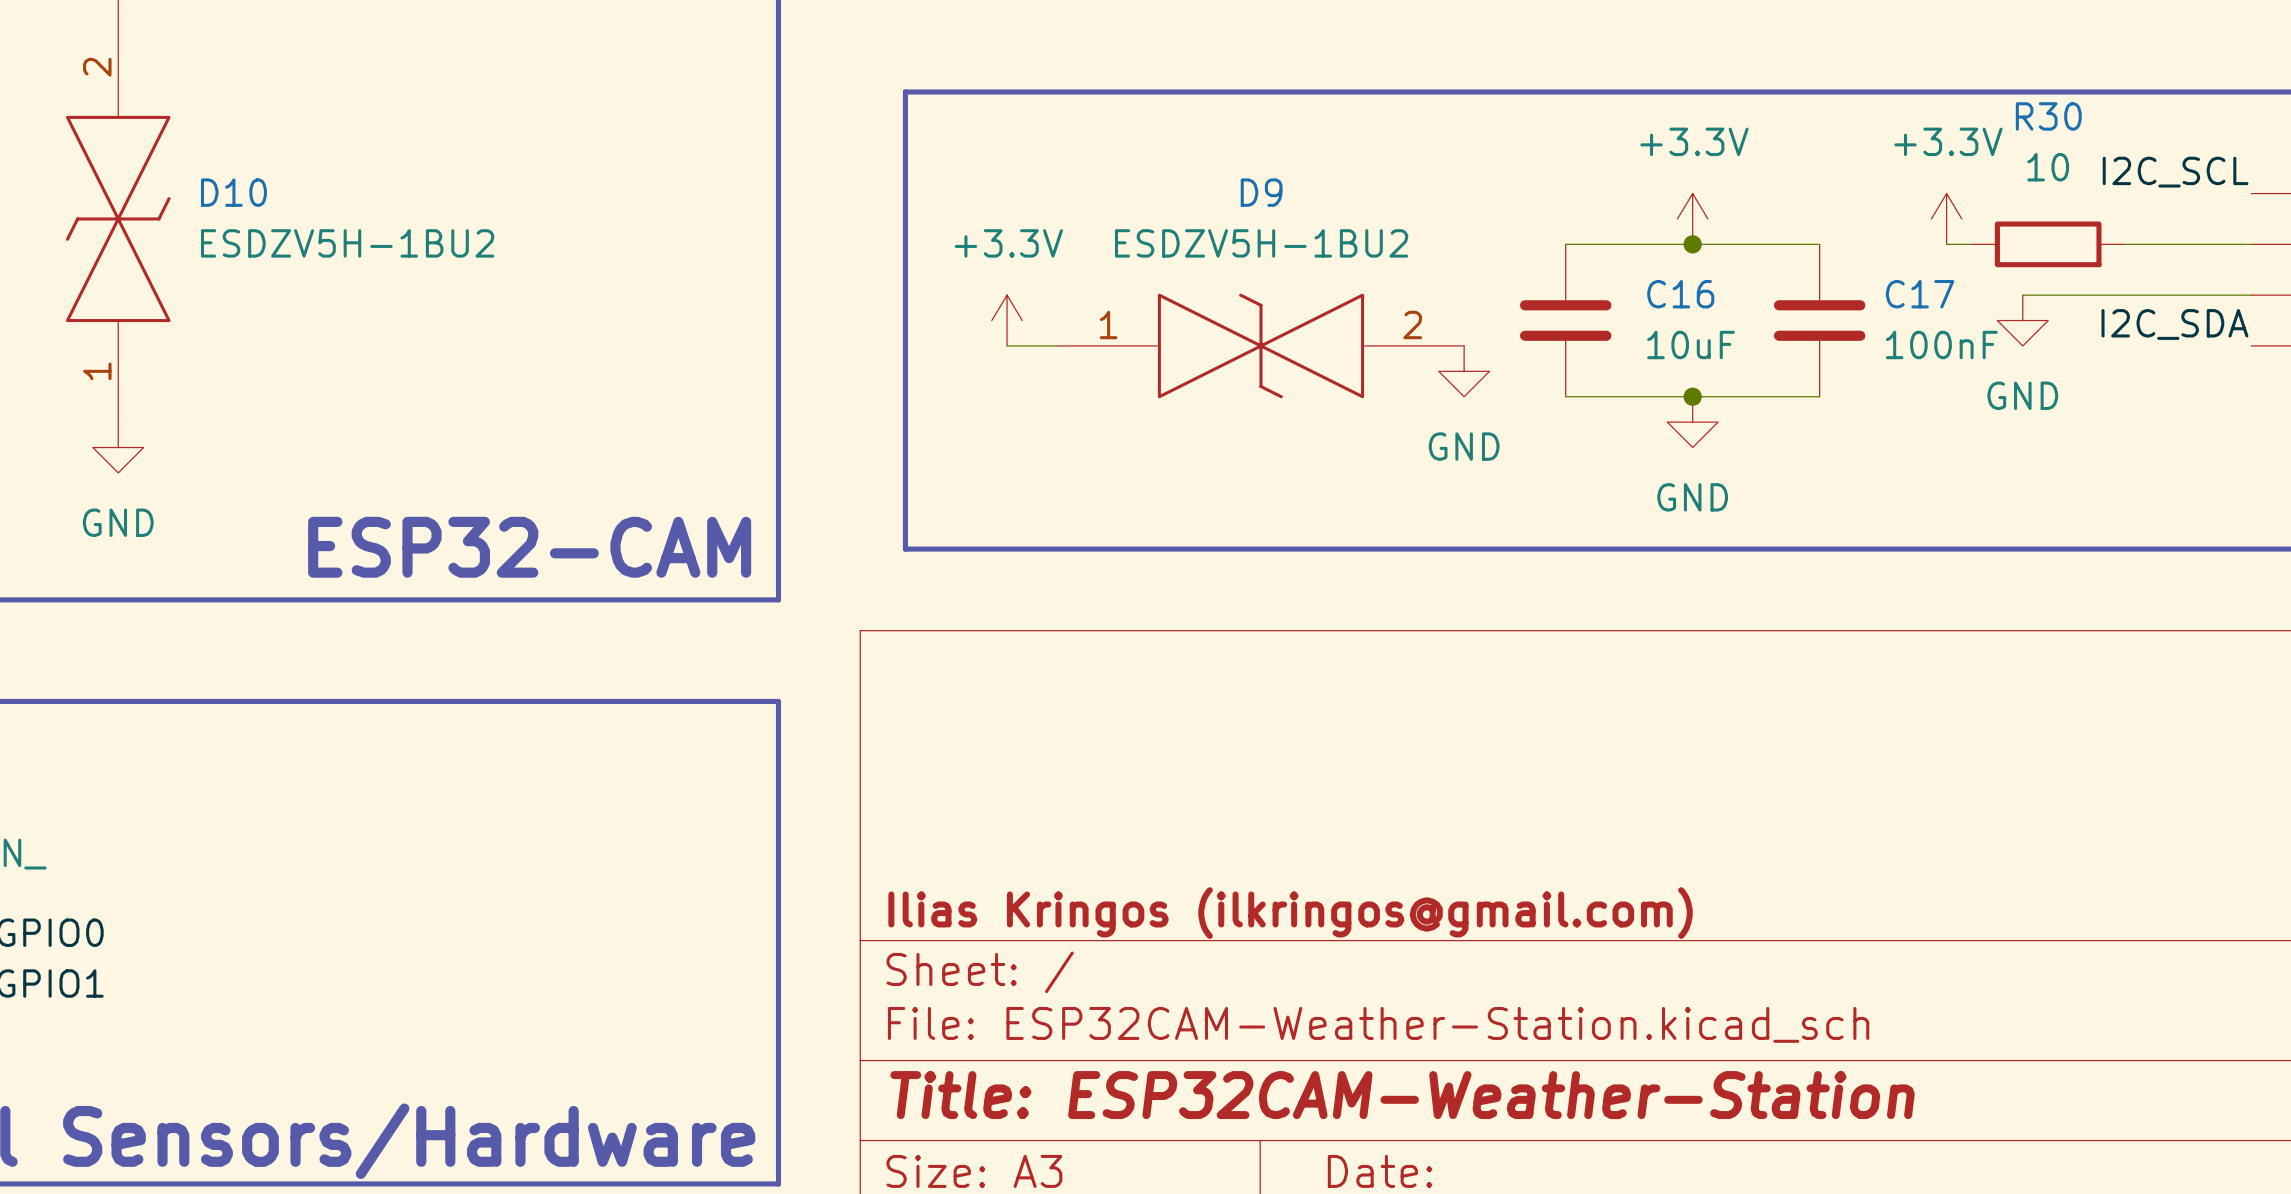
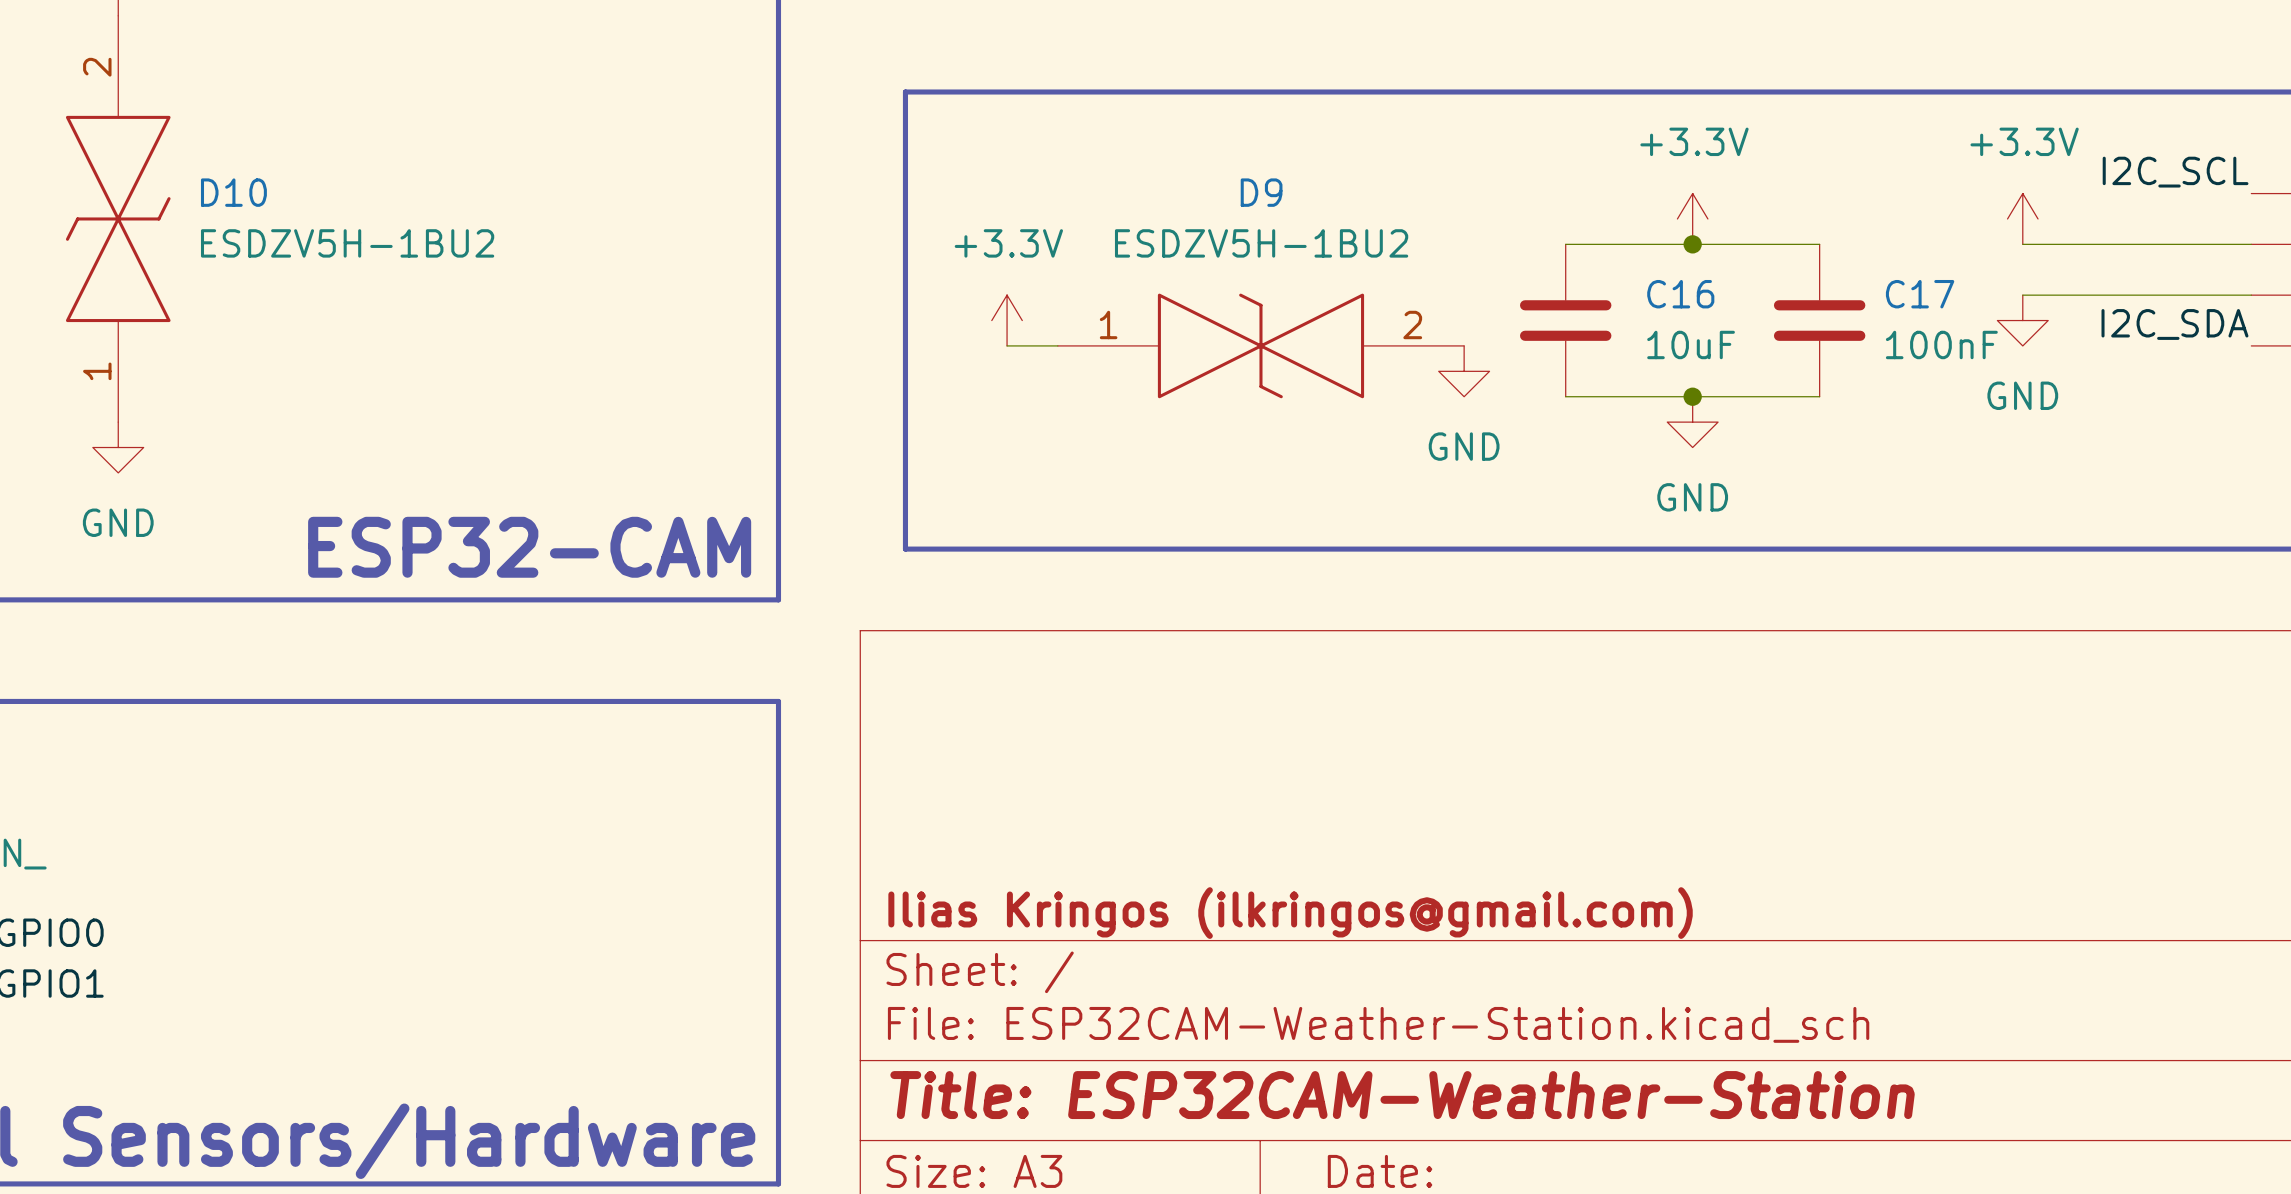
power symbol position: +3.3V (1946, 218) -> +3.3V (2022, 218)
wire: (1946, 244) (1972, 244) -> none
wire: none -> (2022, 244) (2124, 244)
R30: 10 (2048, 244) -> none

